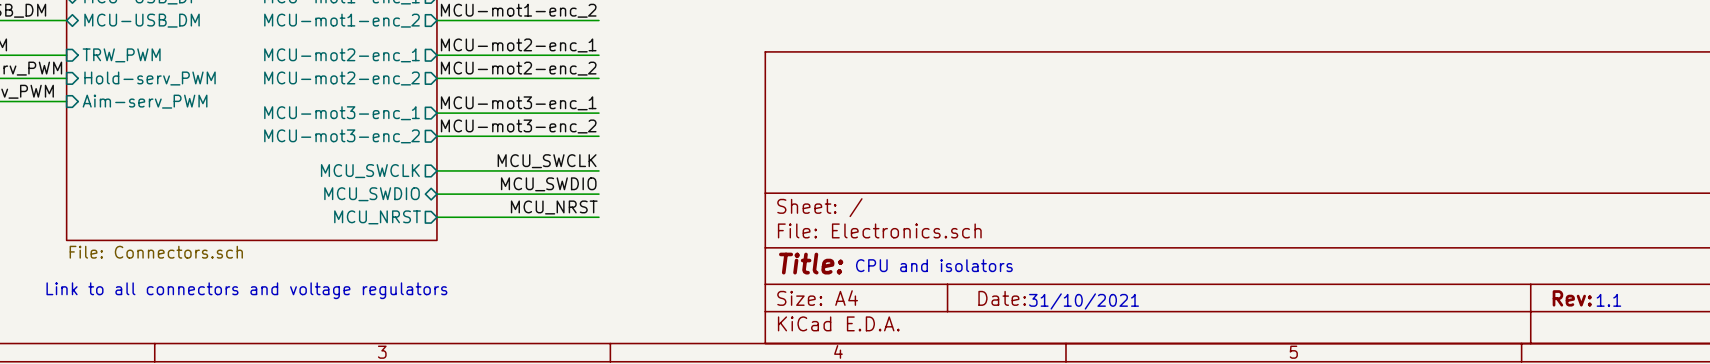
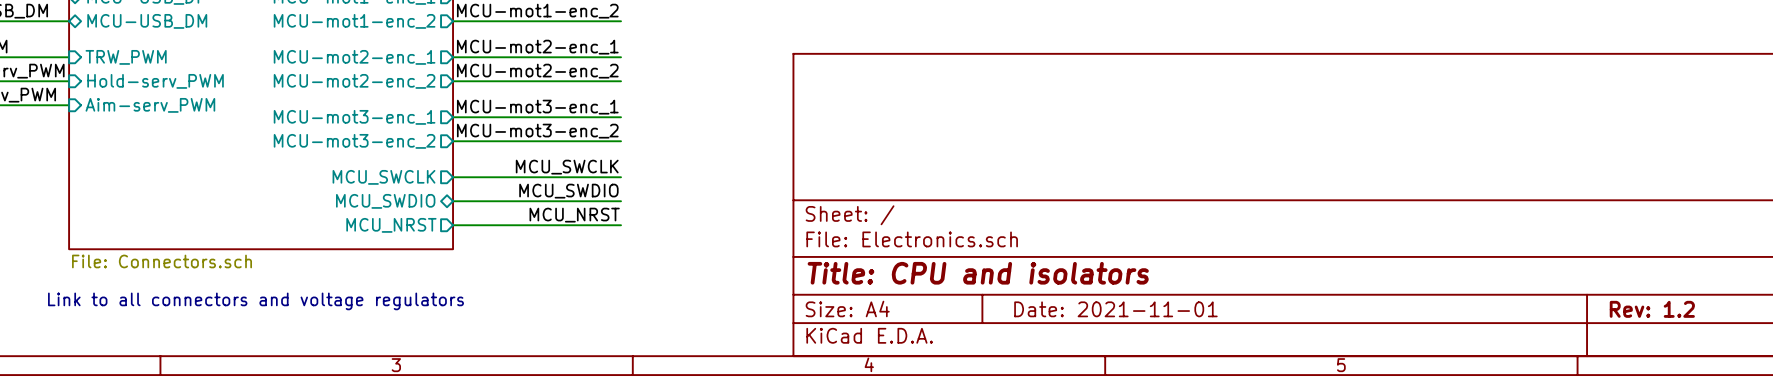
title block: Title: (811, 263) -> Title: CPU and isolators (978, 273)
text: CPU and isolators (934, 265) -> none
title block: Date: (1002, 298) -> Date: 2021-11-01 (1115, 309)
title block: Rev: (1572, 298) -> Rev: 1.2 (1652, 309)
text: 1.1 (1608, 300) -> none
text: 31/10/2021 (1084, 301) -> none

